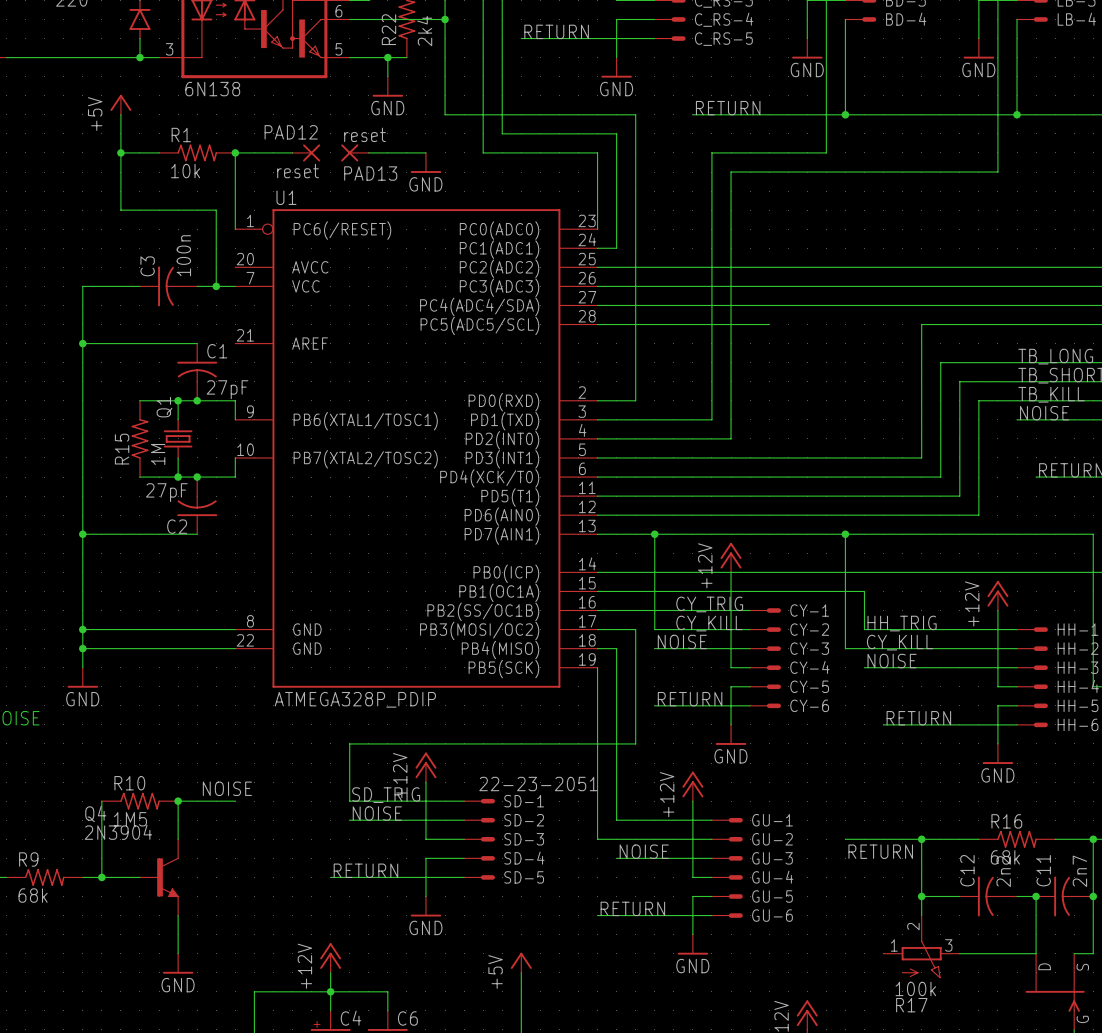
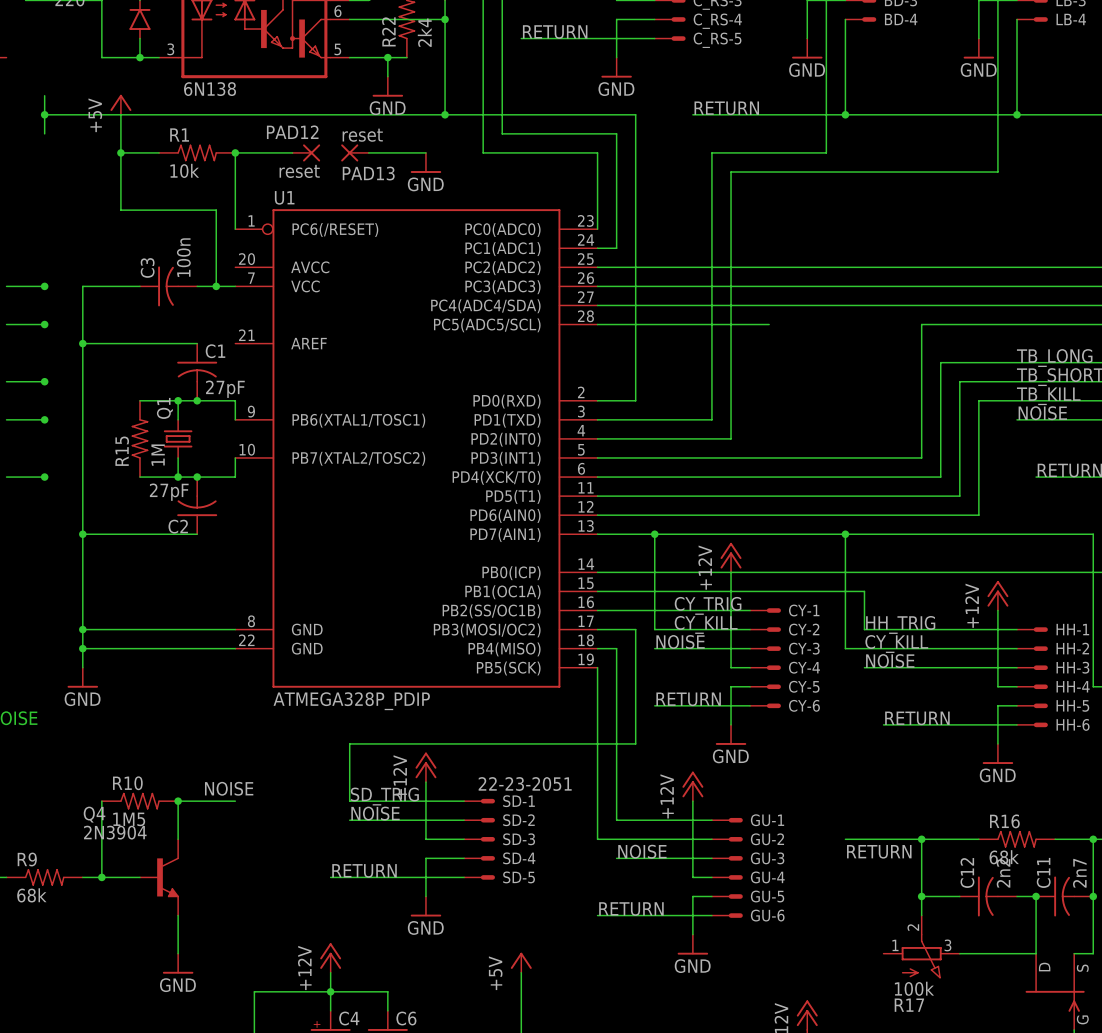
wire: (6, 57) (101, 57) -> (25, 0) (101, 0) (101, 57)
wire: none -> (44, 95) (44, 133)
wire: none -> (44, 114) (445, 114)
junction: none -> (44, 114)
junction: none -> (445, 114)
wire: none -> (6, 286) (44, 286)
junction: none -> (44, 286)
wire: none -> (6, 324) (44, 324)
junction: none -> (44, 324)
wire: none -> (6, 381) (44, 381)
junction: none -> (44, 381)
wire: none -> (6, 419) (44, 419)
junction: none -> (44, 419)
wire: none -> (6, 477) (44, 477)
junction: none -> (44, 477)

